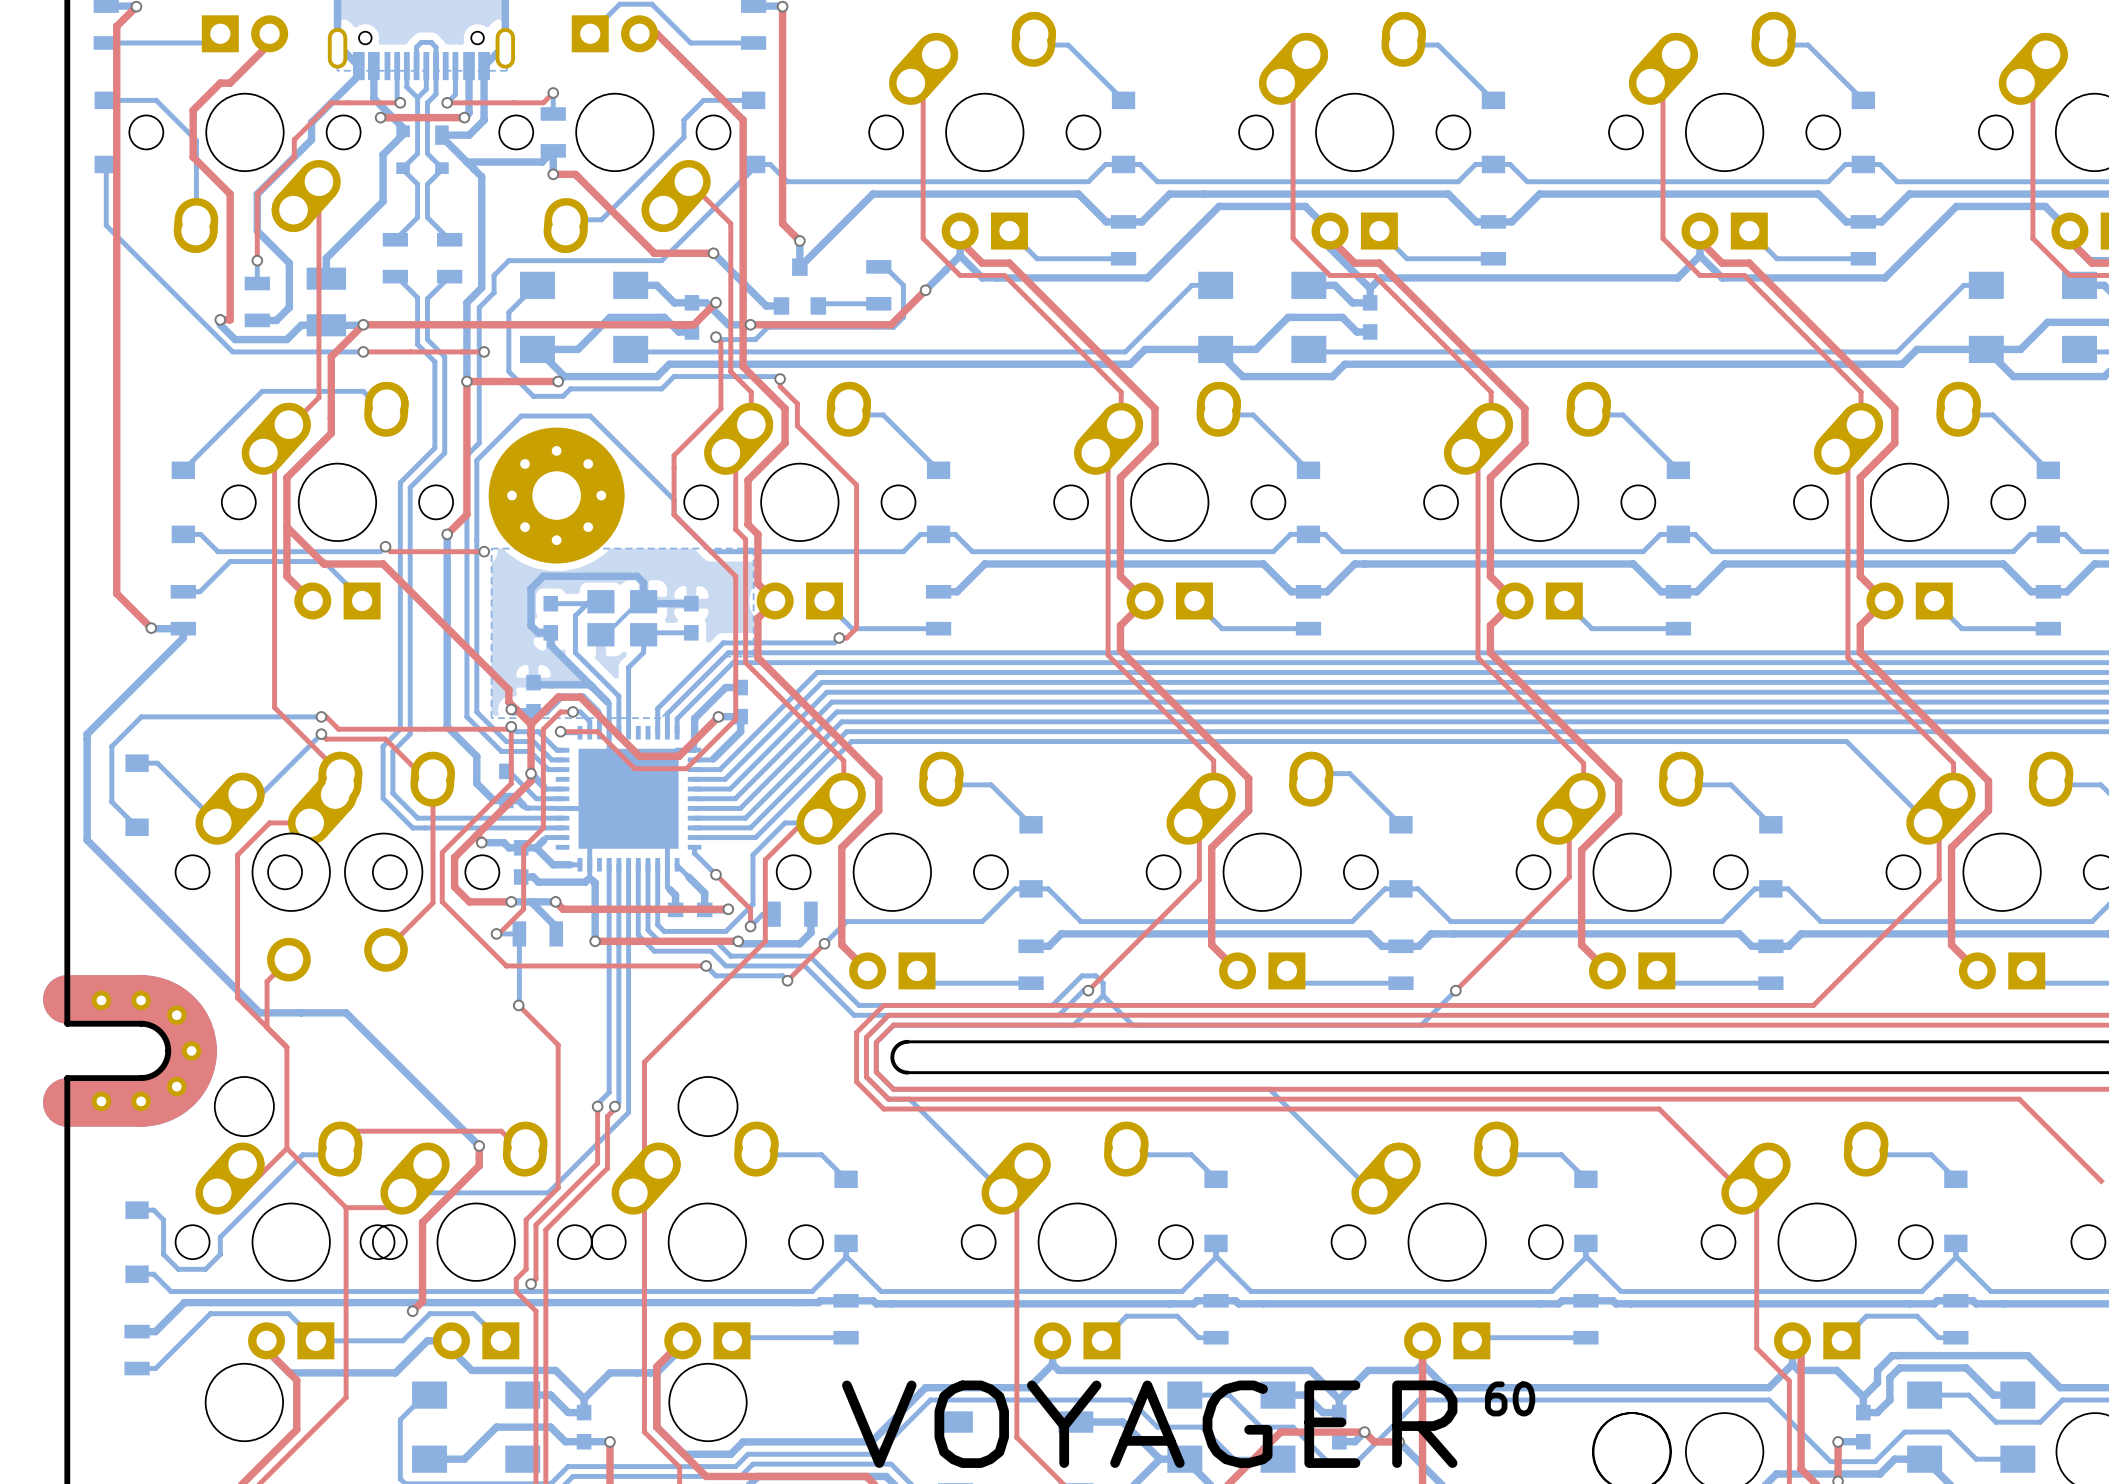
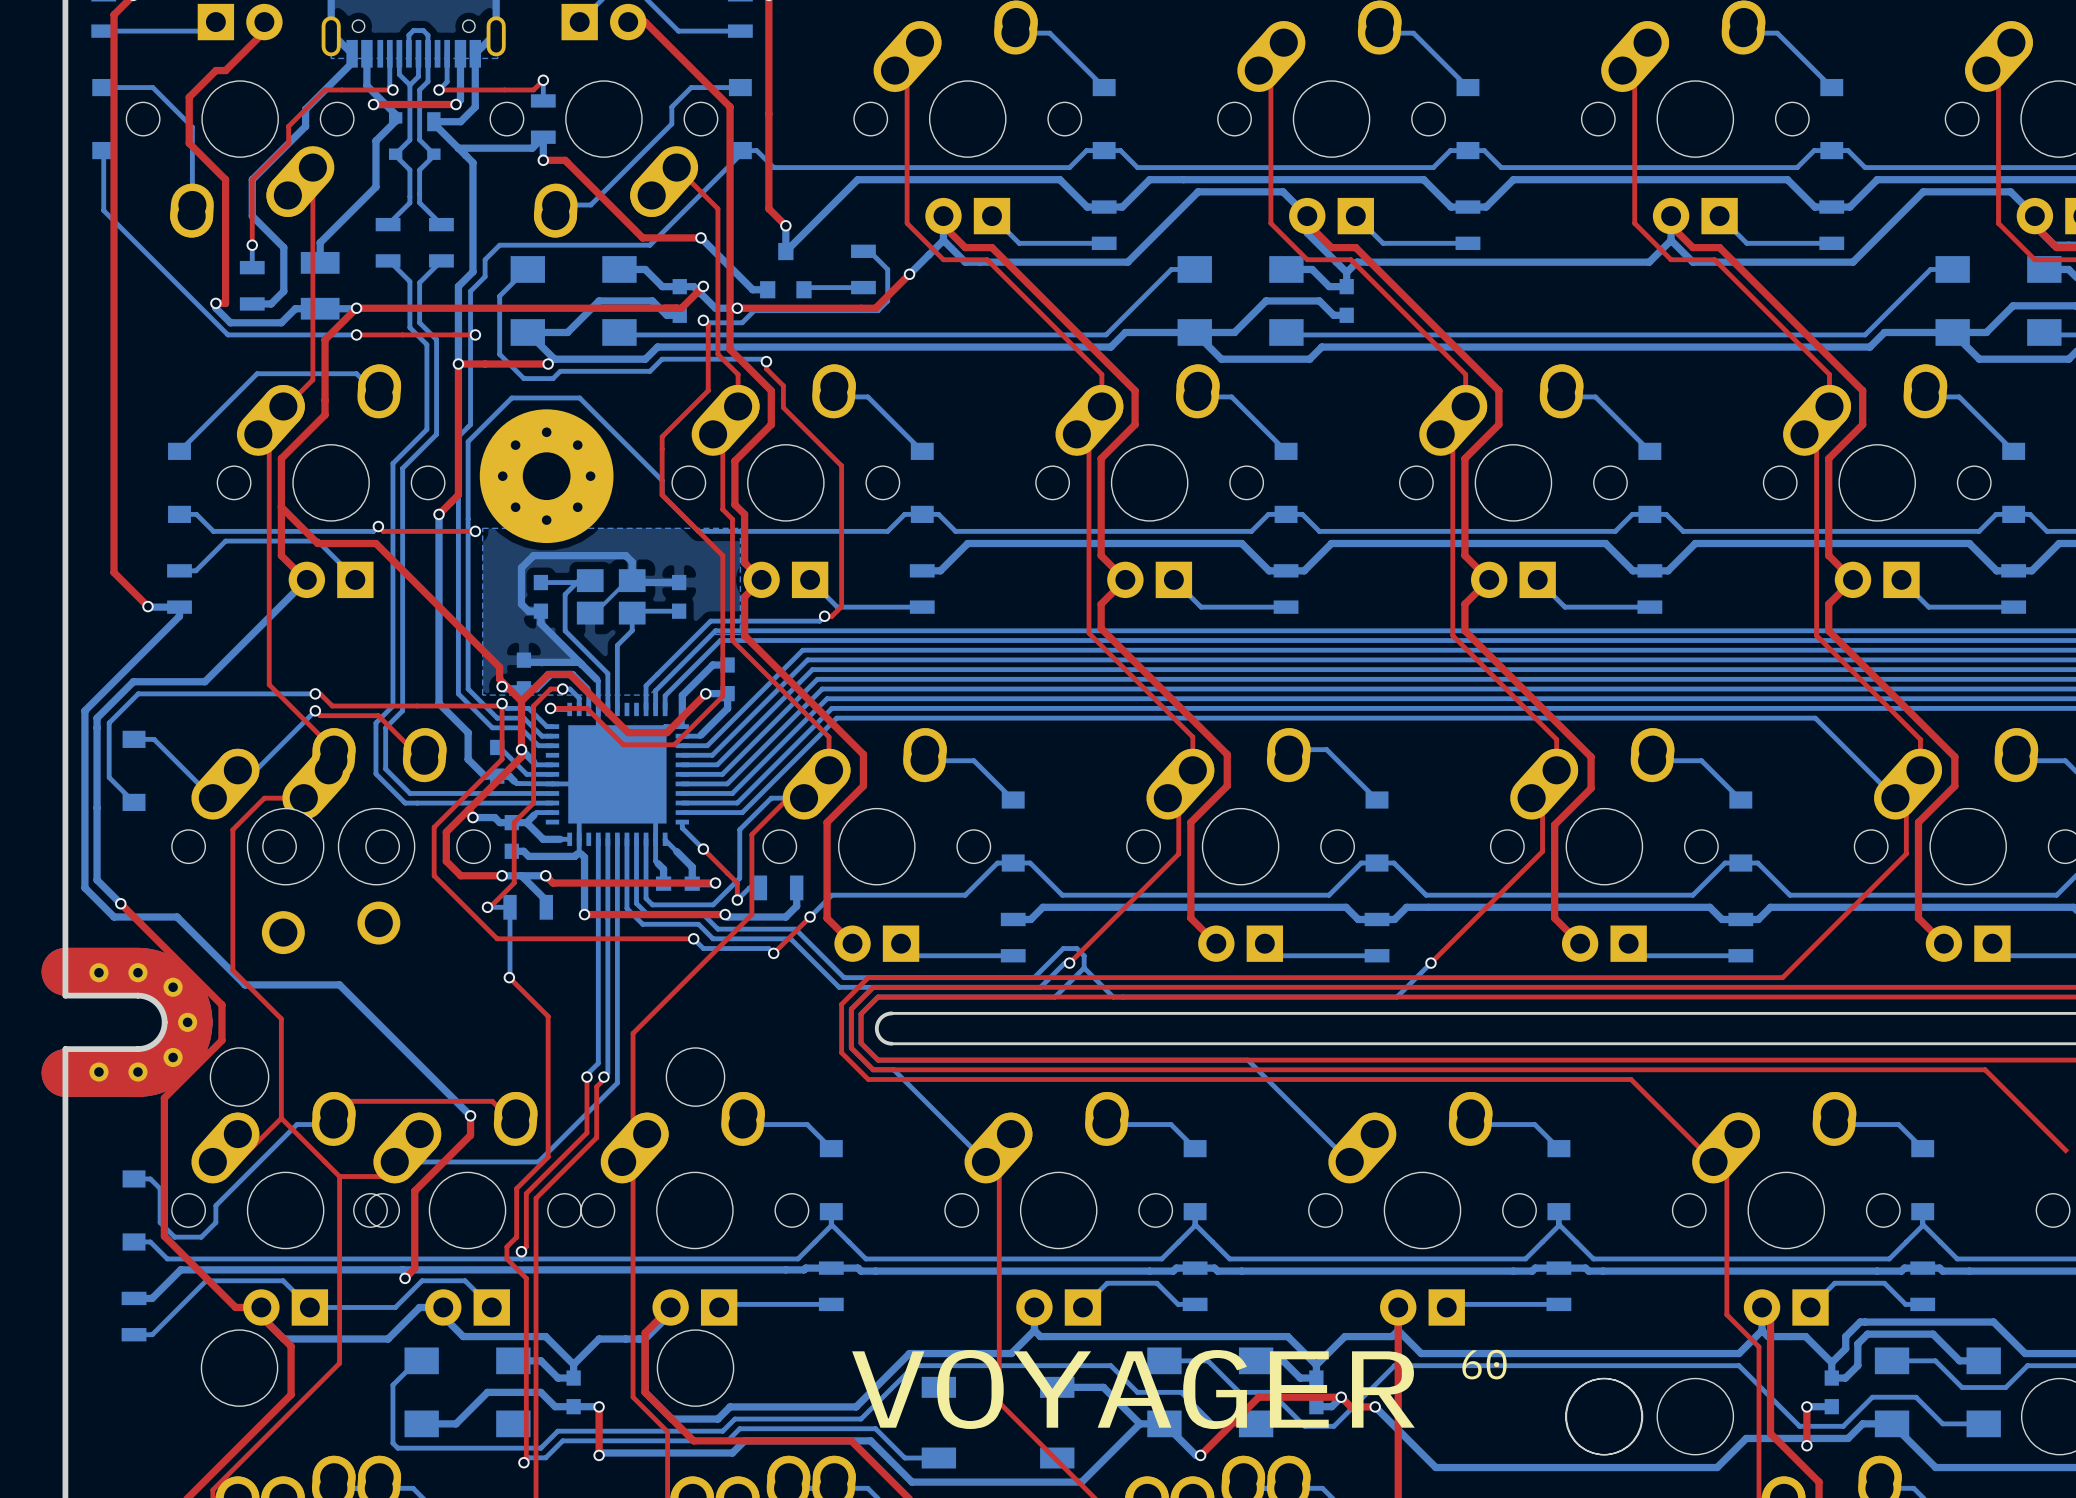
bottom track: none -> (306, 579) (204, 681) (133, 681) (97, 718) (97, 880) (120, 903)
top track: (433, 773) (433, 902) (386, 949) -> none
bottom track: (87, 840) (259, 1012) -> (84, 815) (84, 887) (114, 917) (177, 917) (245, 984) (254, 984)
top track: none -> (120, 903) (221, 1004) (221, 1040) (164, 1098) (164, 1236) (235, 1307) (261, 1307)
via: none -> (120, 903)
top track: (288, 959) (267, 981) (267, 1027) -> none

